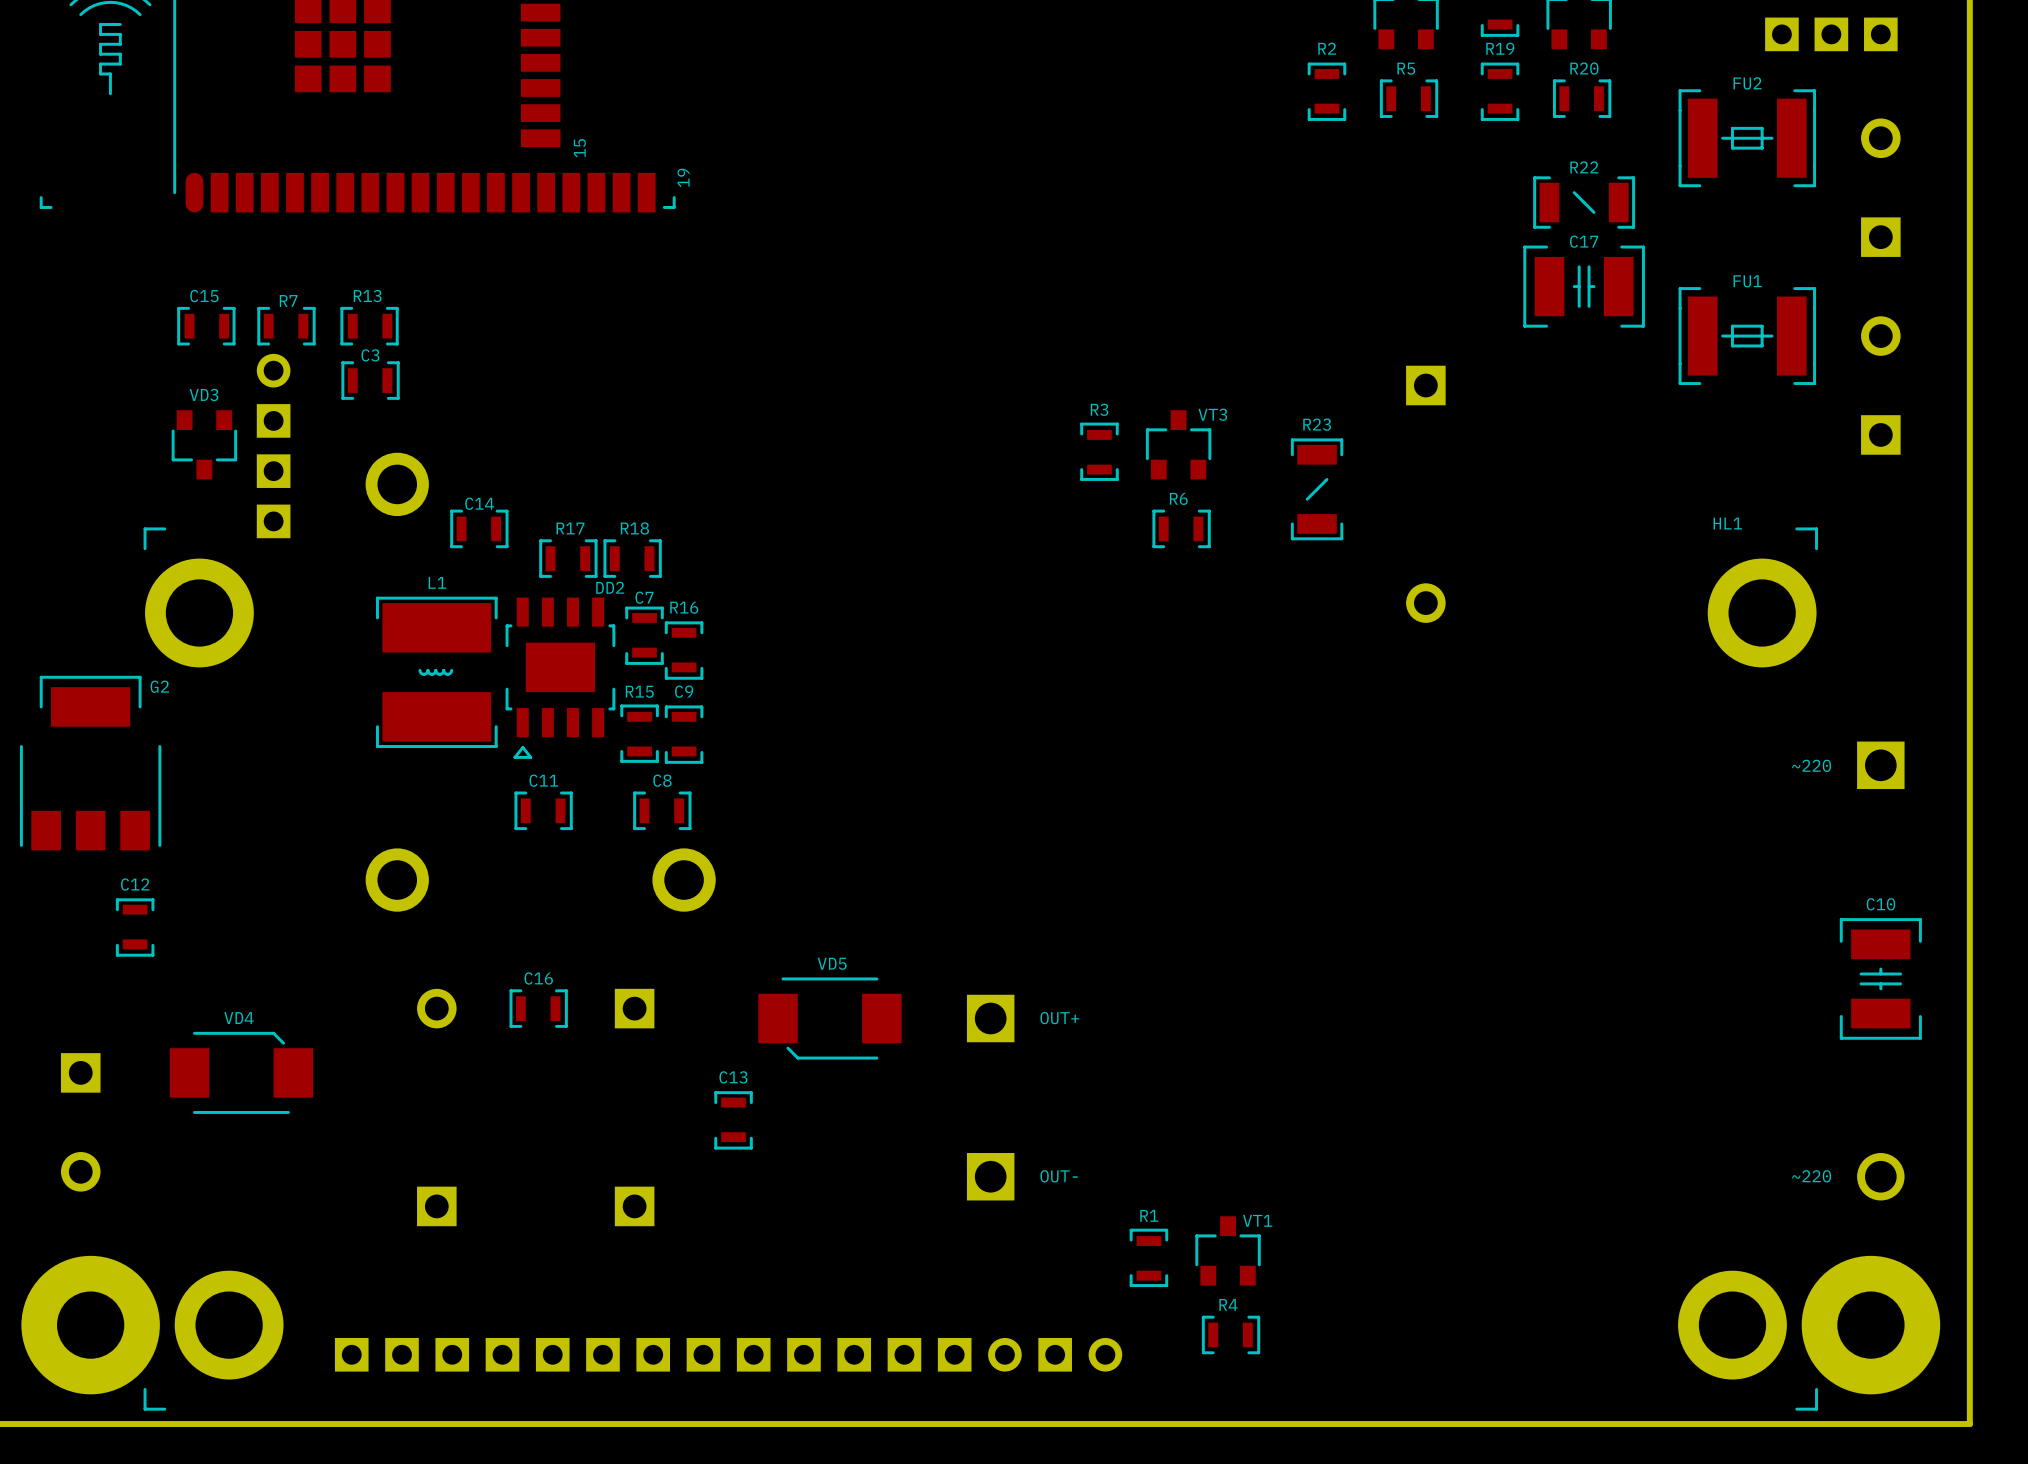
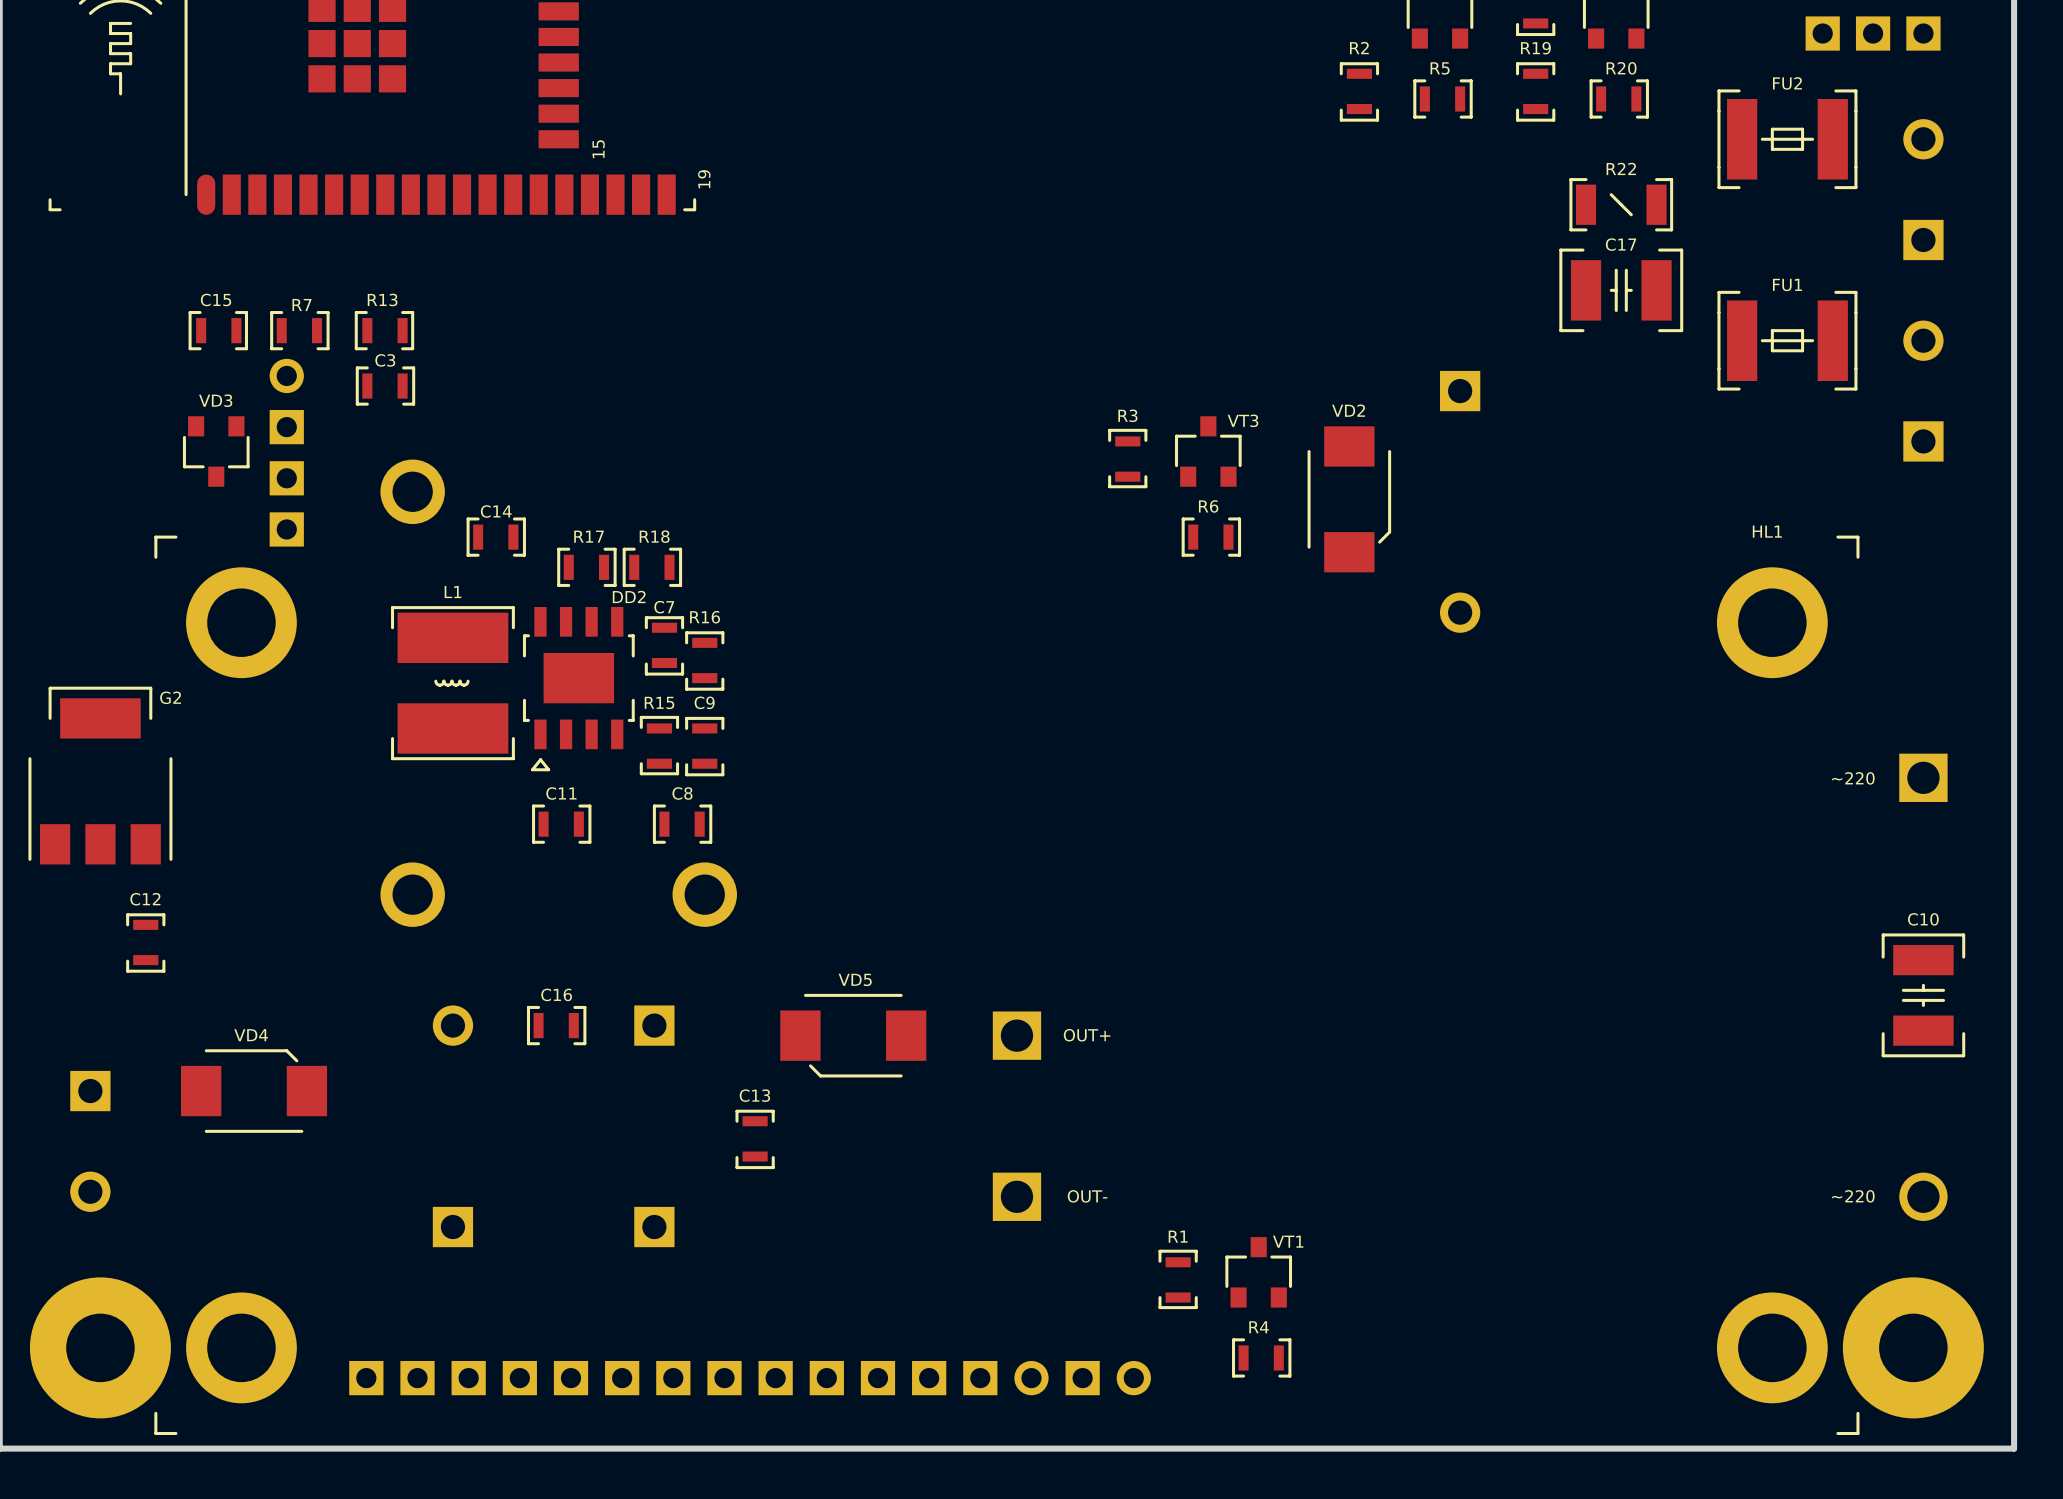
R23: (1317, 489) -> none
VD2: none -> (1349, 499)
HL1 footprint: [143, 527, 1819, 1411] -> [154, 535, 1860, 1436]

